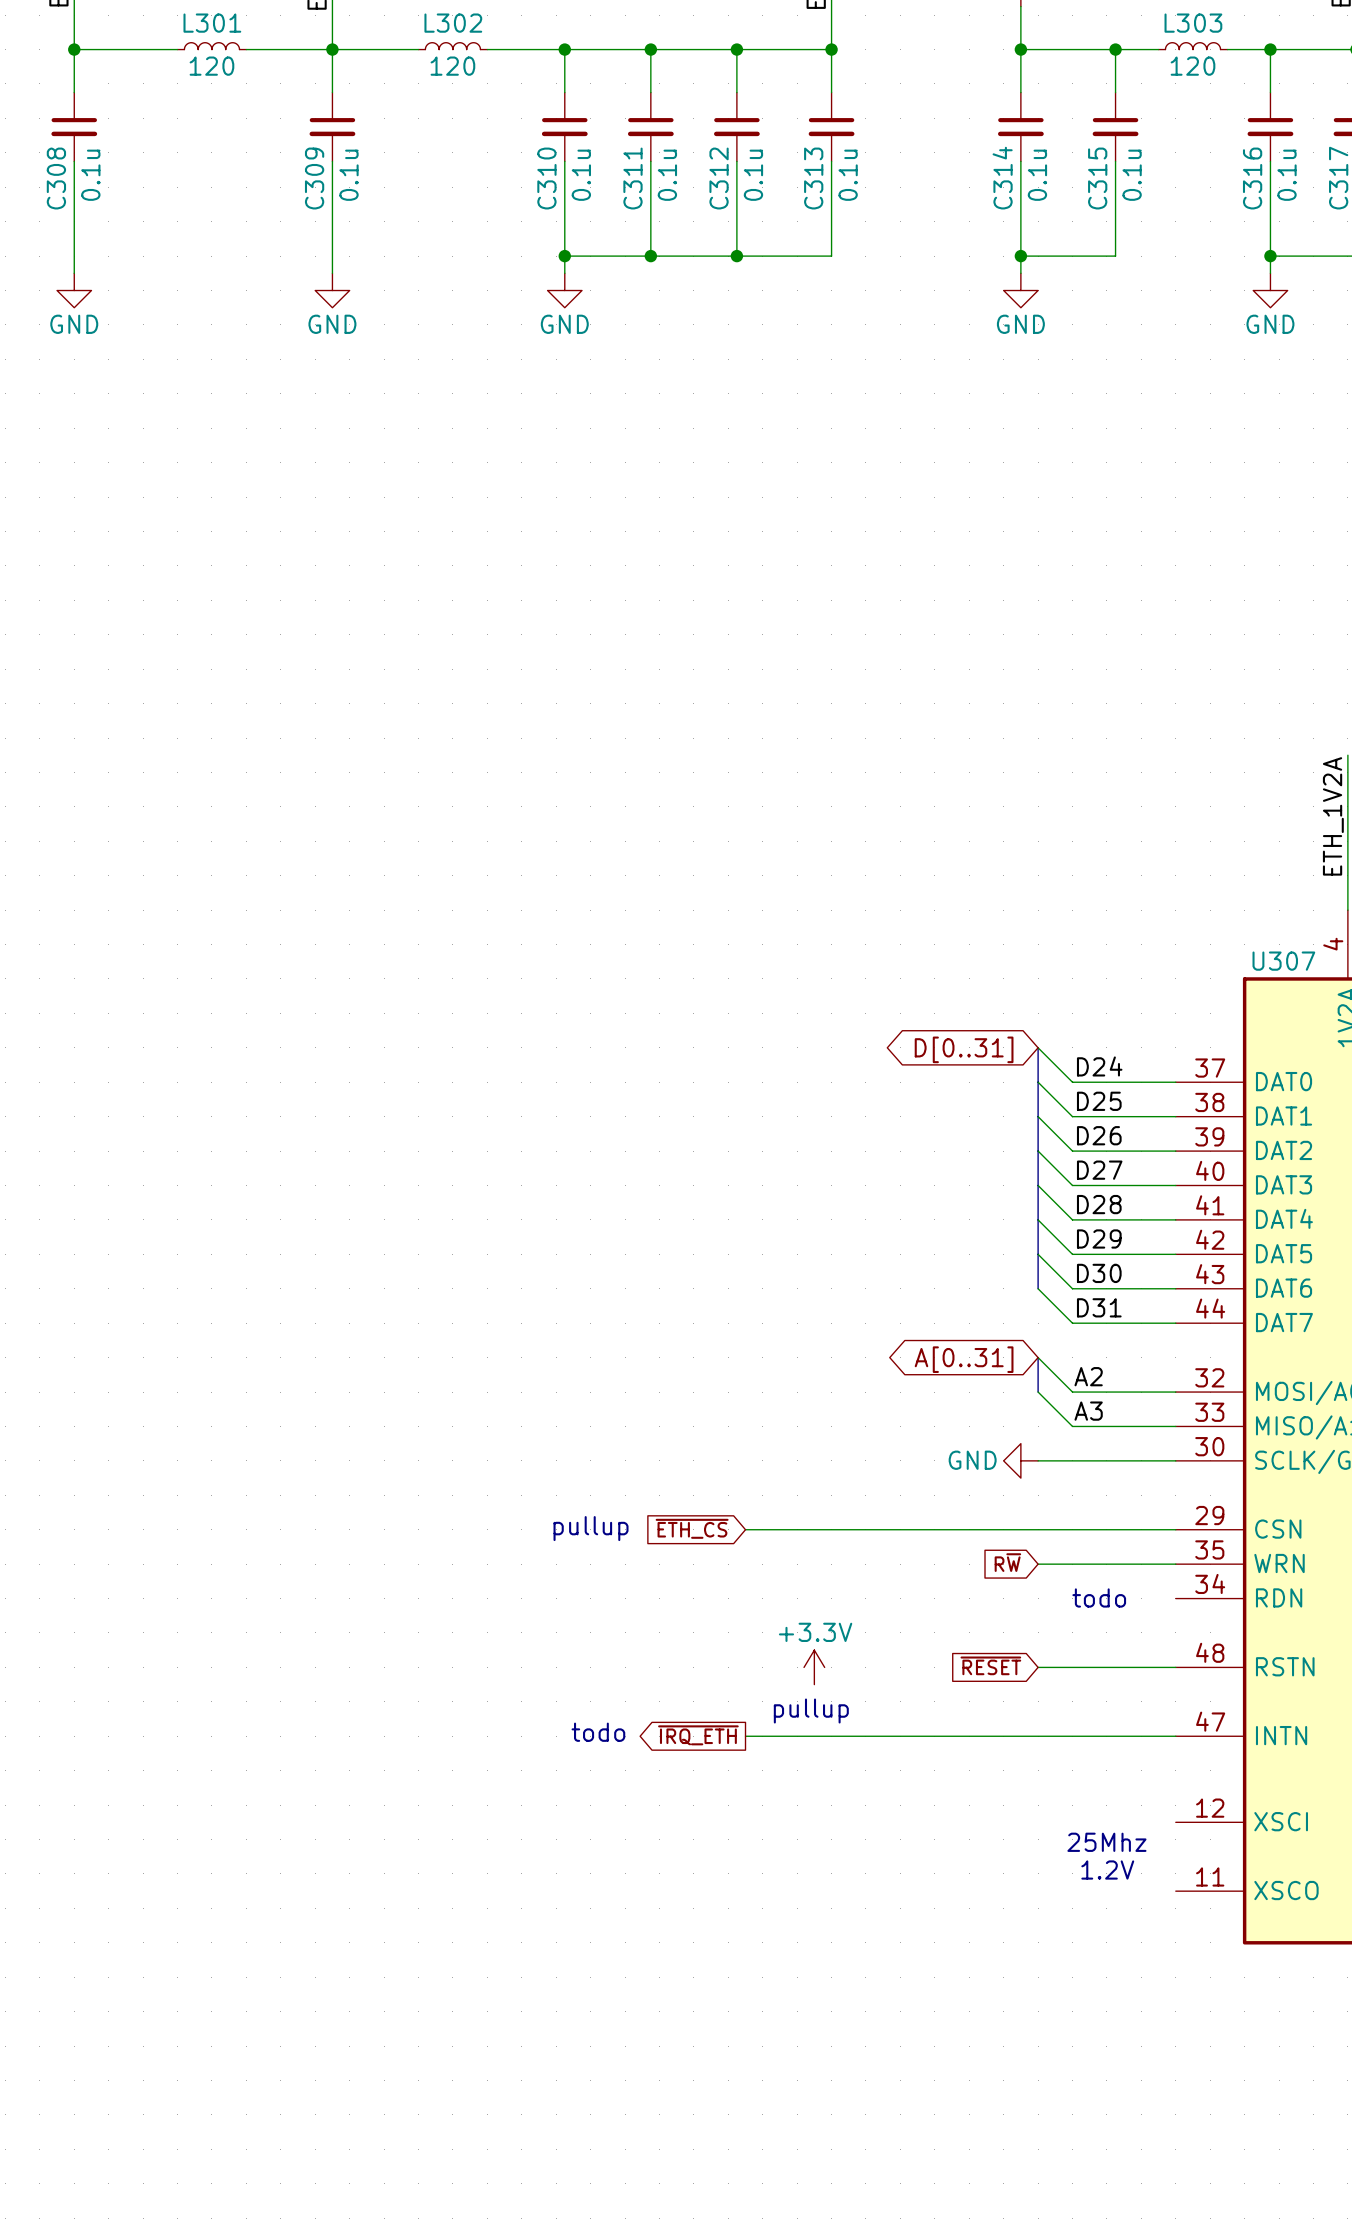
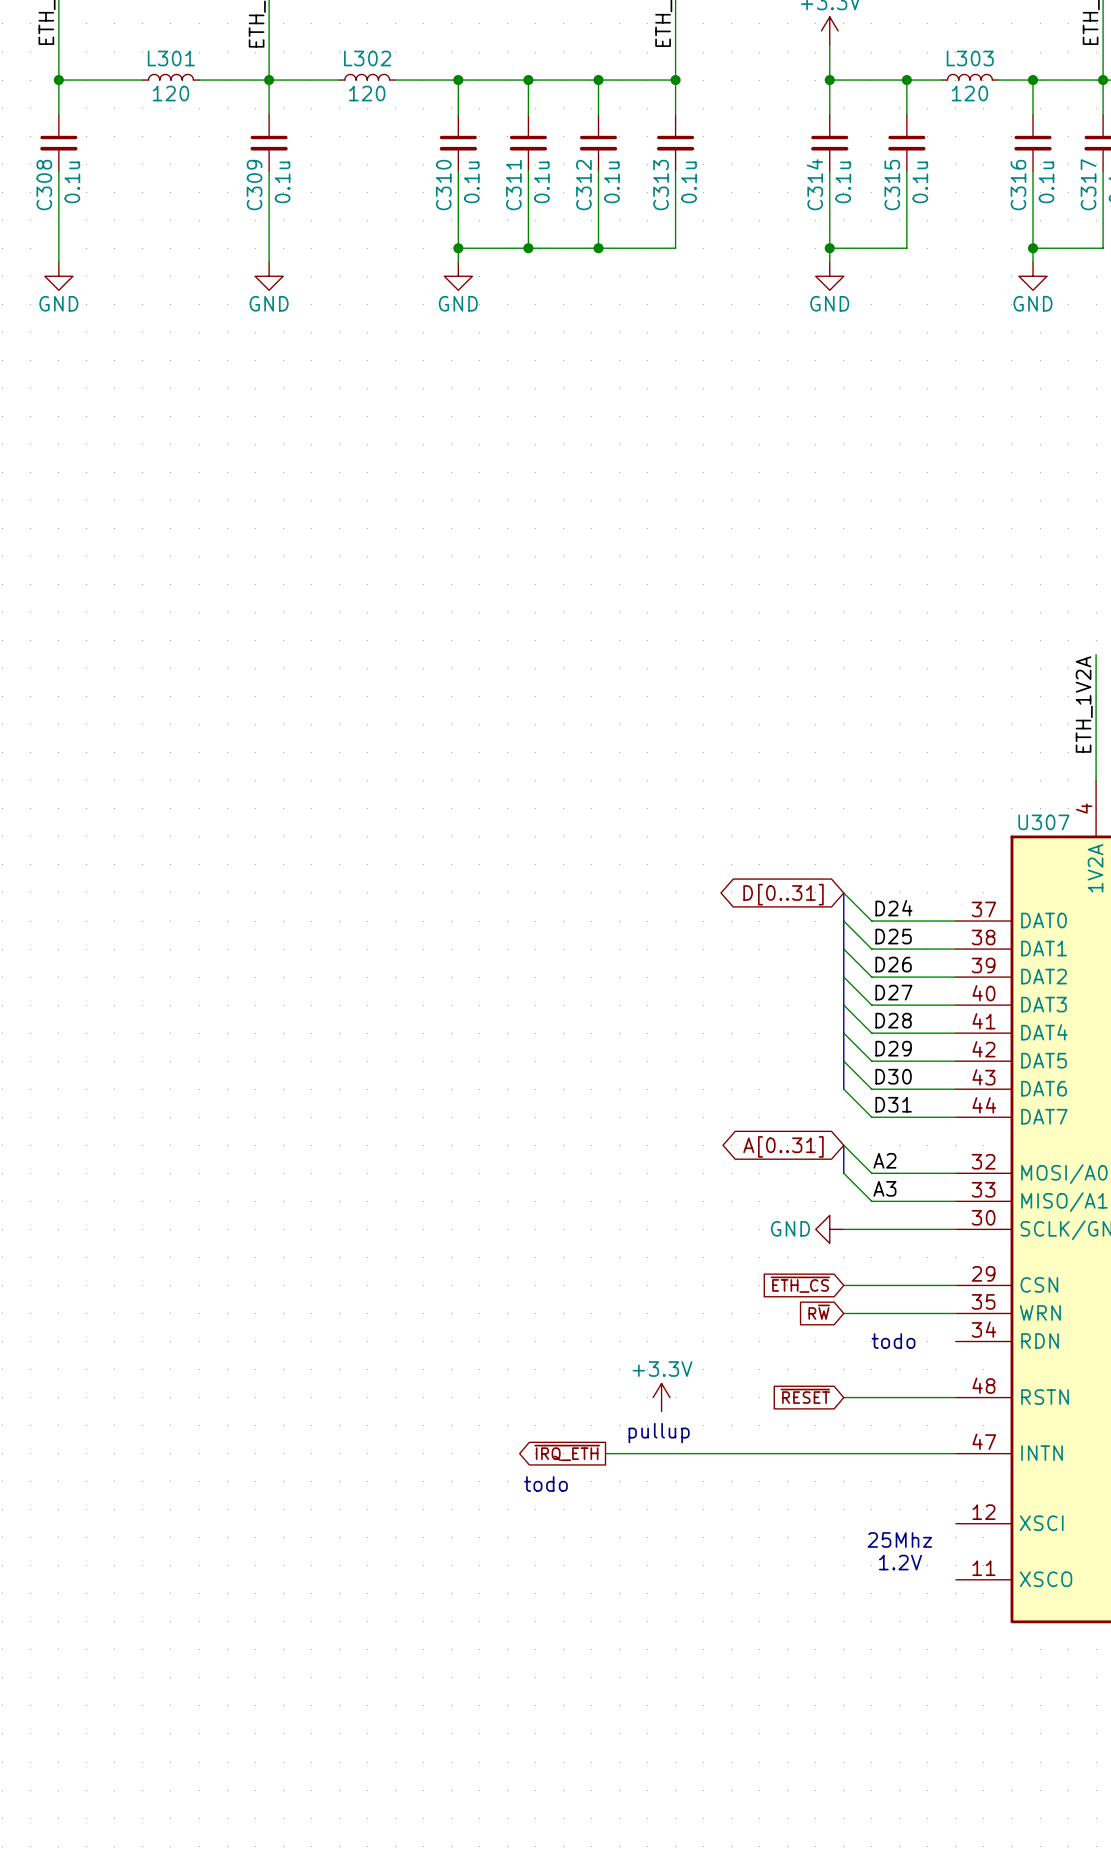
text: pullup (591, 1528) -> none
global label position: ~{ETH_CS} (692, 1528) -> ~{ETH_CS} (800, 1284)
wire: (745, 1529) (1038, 1529) -> none
text position: todo (598, 1732) -> todo (545, 1484)

